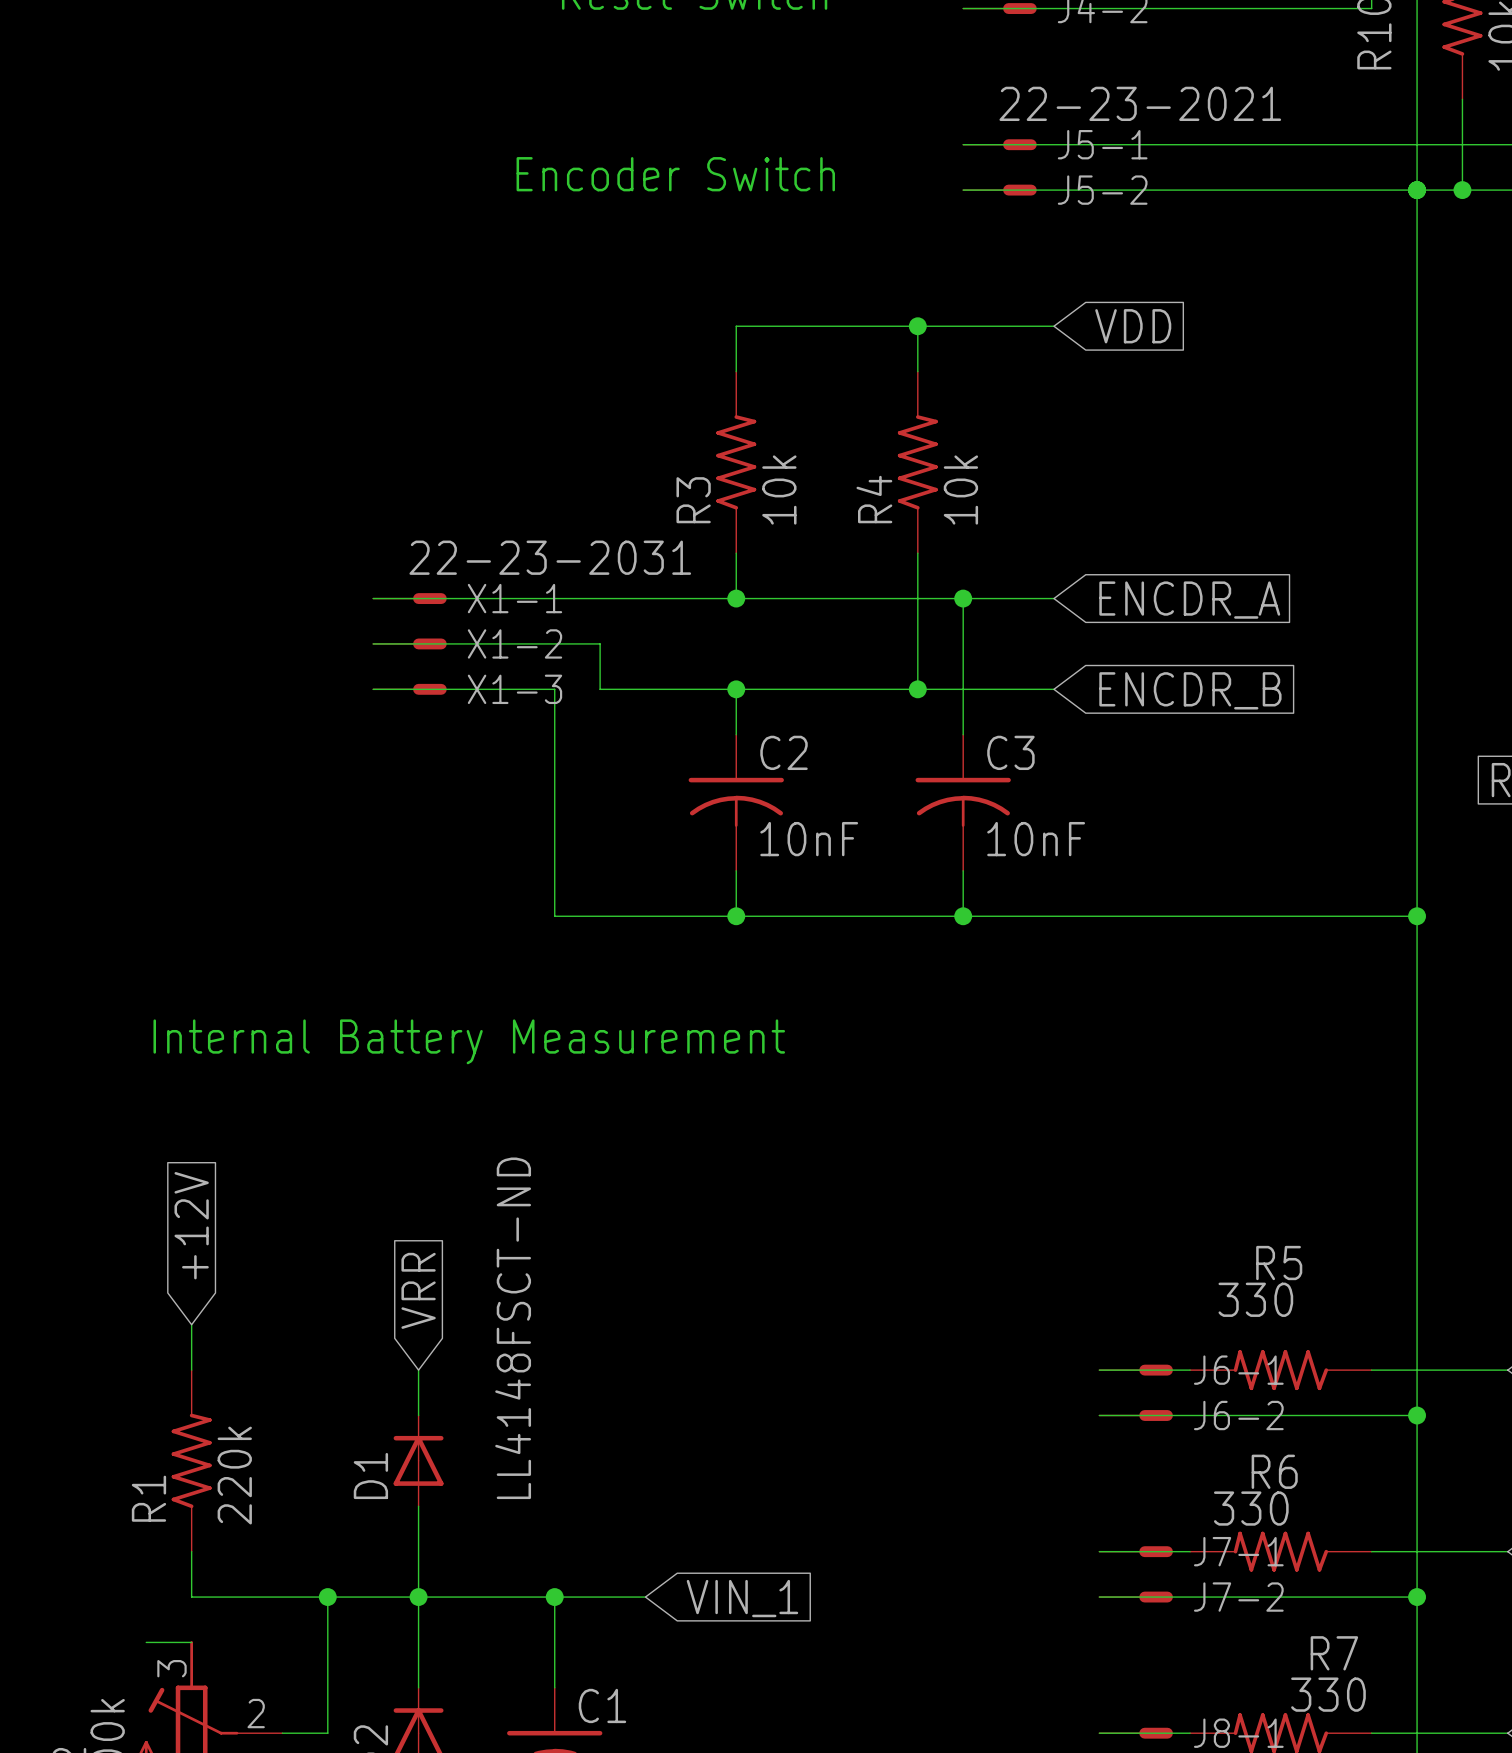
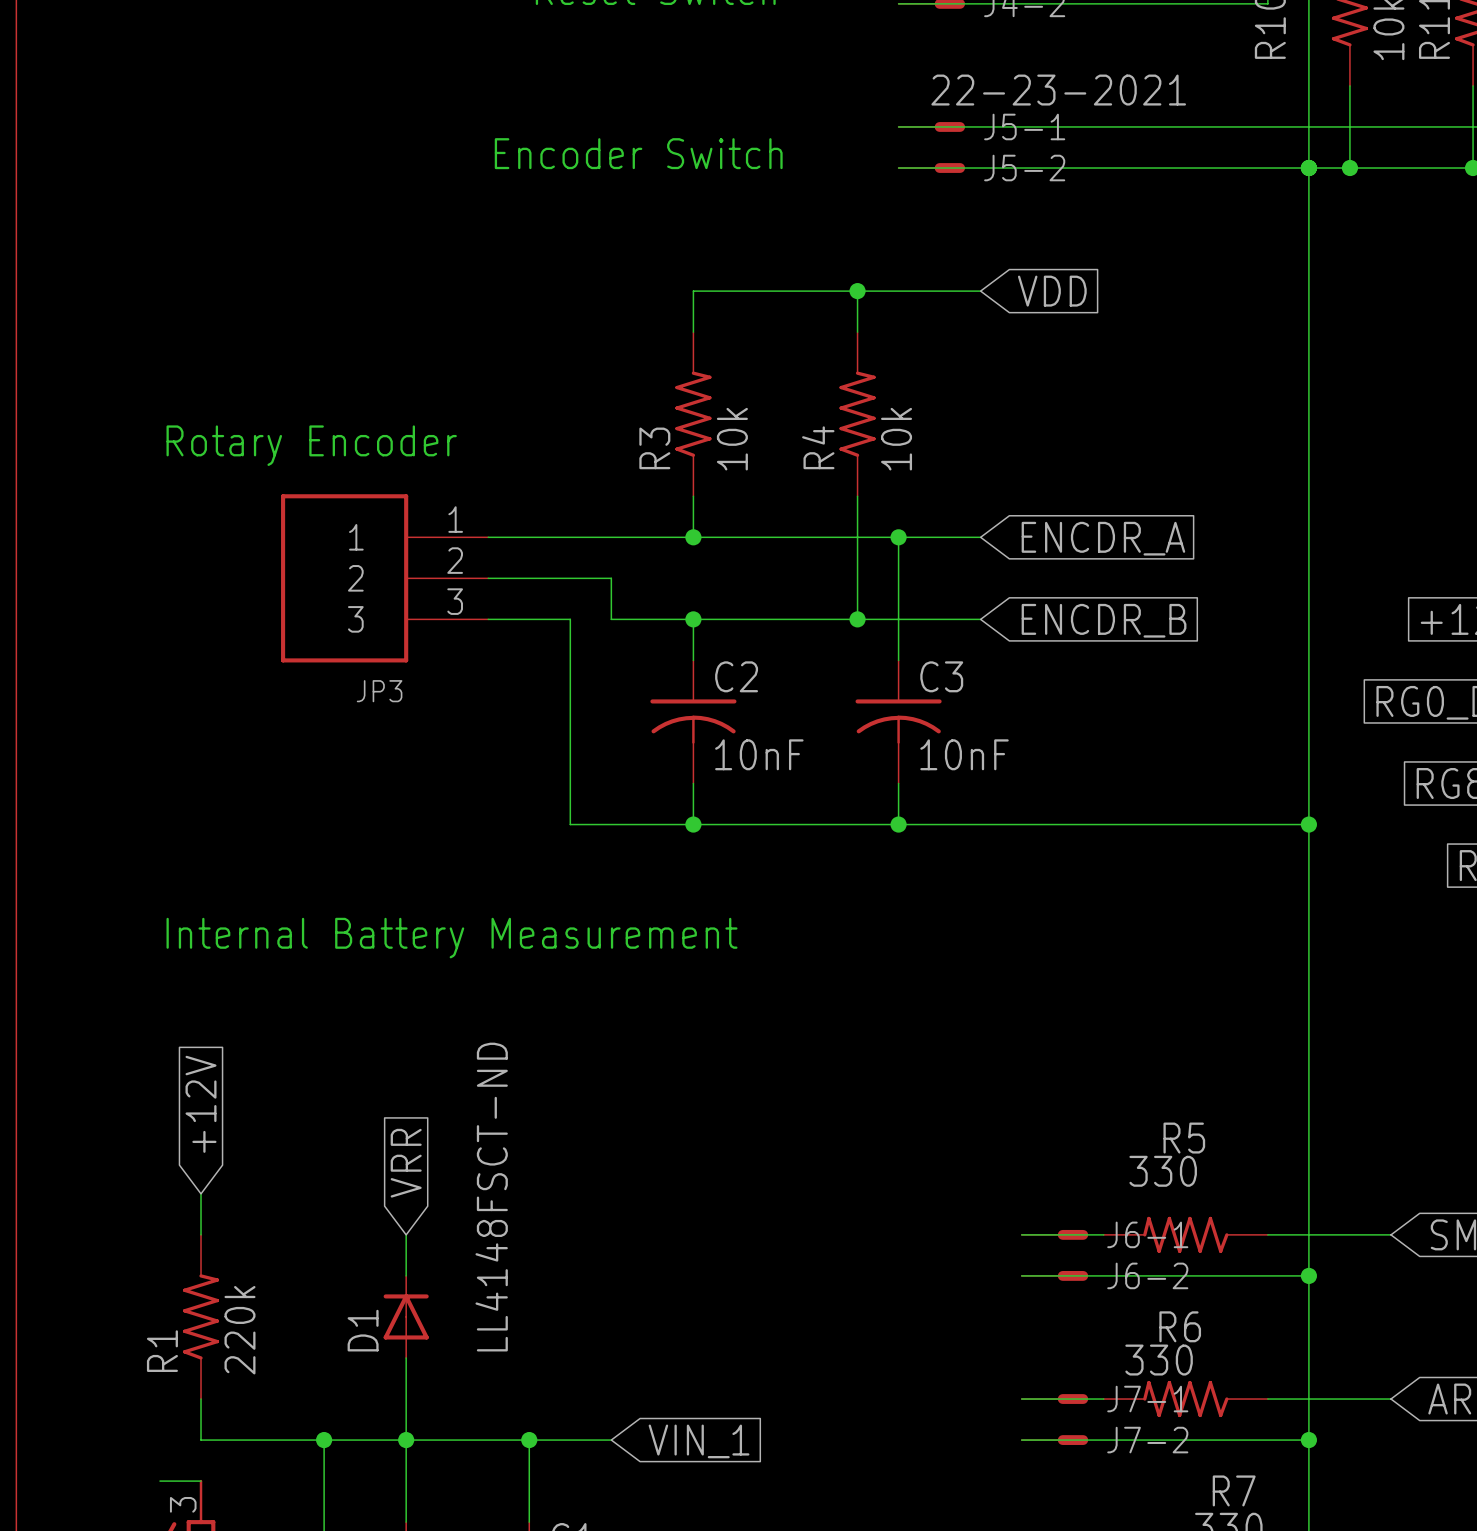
text: none -> Rotary Encoder (311, 445)
X1-1: 22-23-2031 (409, 598) -> none
JP3: none -> (384, 578)
X1-2: (409, 643) -> none
wire: (600, 643) (600, 689) (645, 689) -> (570, 578) (611, 578) (611, 619)
X1-3: (409, 689) -> none
wire: (554, 689) (554, 916) (600, 916) -> (529, 619) (570, 619) (570, 824)

